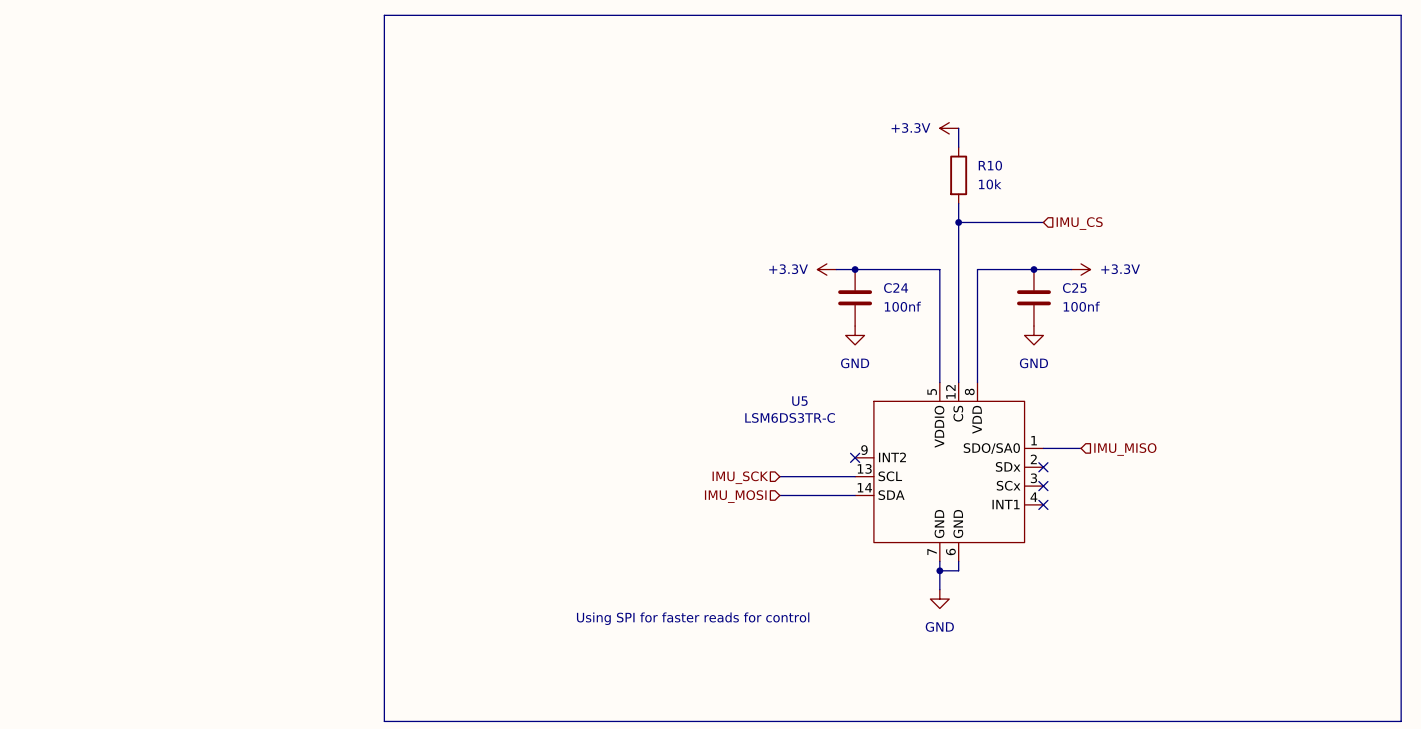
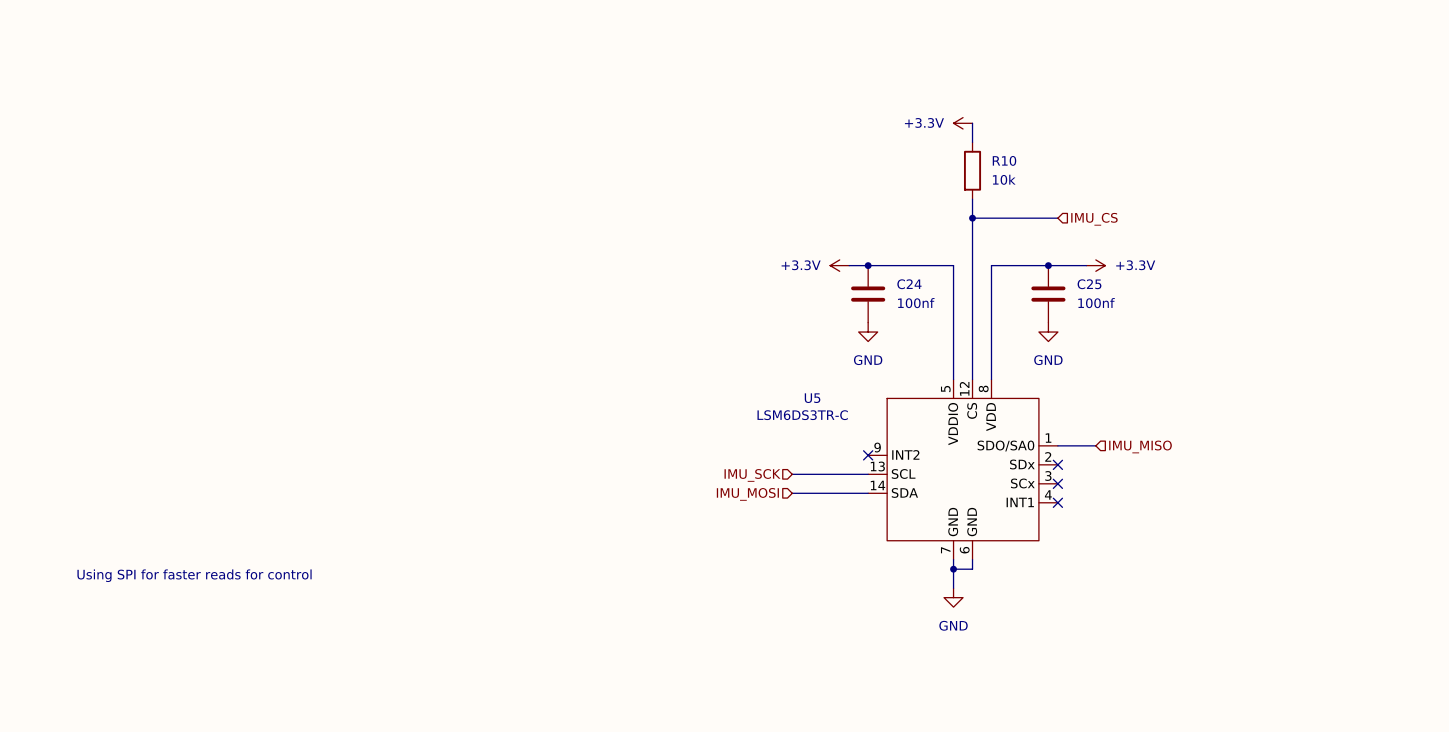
line: (384, 15) (1401, 15) (1401, 721) (384, 721) (384, 15) -> none
text: none -> Using SPI for faster reads for control (194, 575)
text: Using SPI for faster reads for control (693, 618) -> none

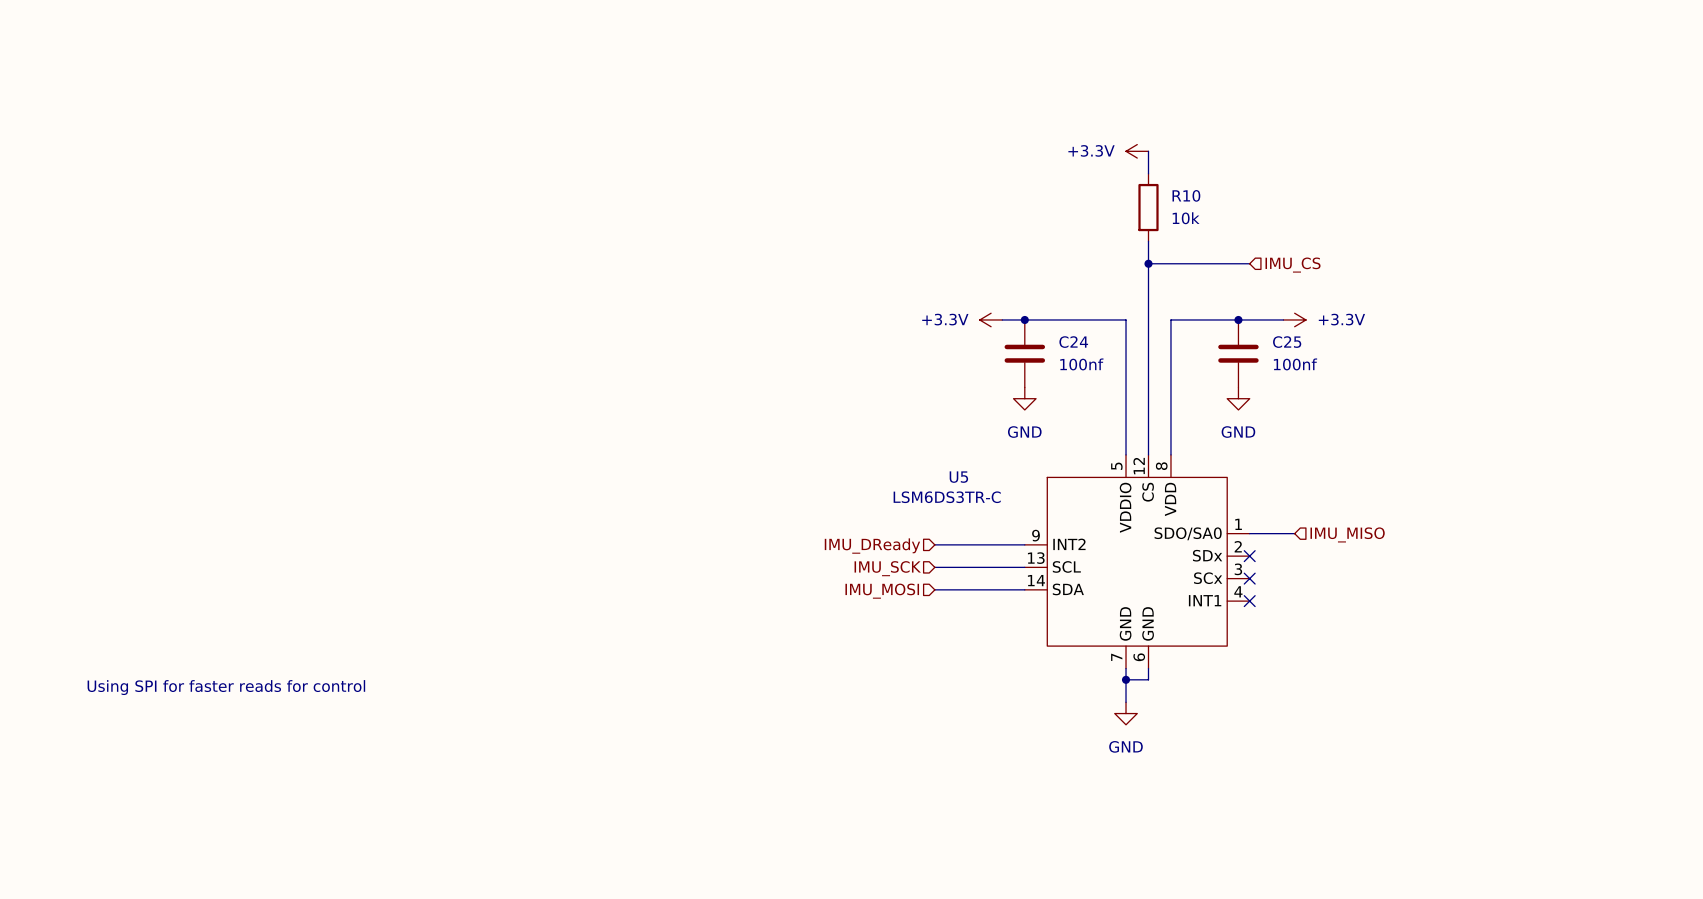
wire: none -> (934, 544) (1024, 544)
no-connect mark: (868, 455) -> none
hierarchical label: none -> IMU_DReady (872, 546)

